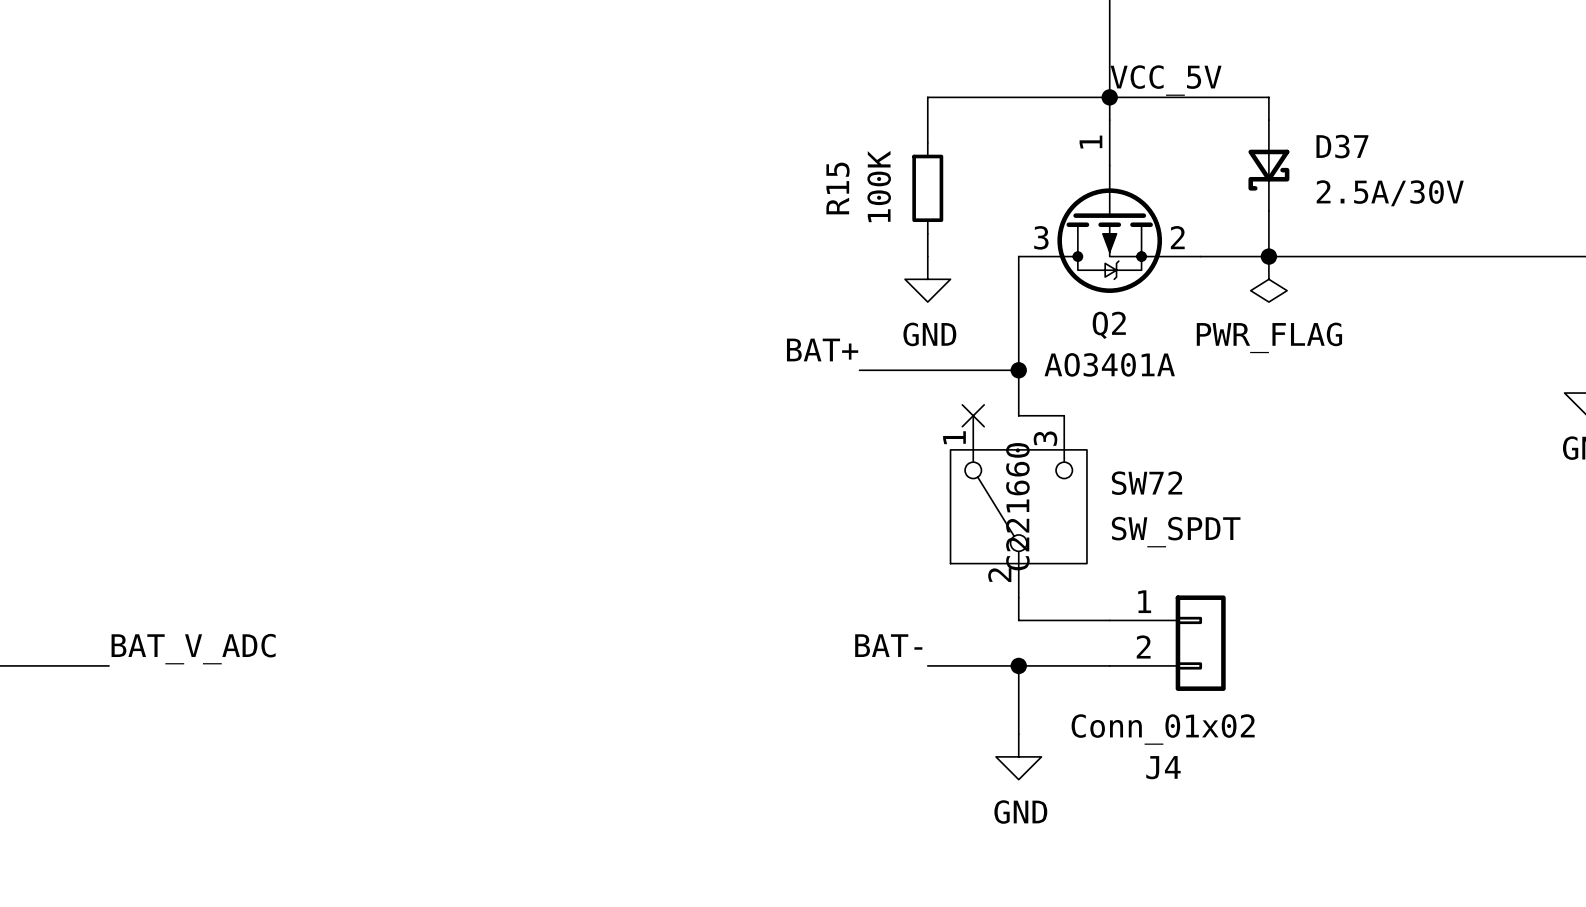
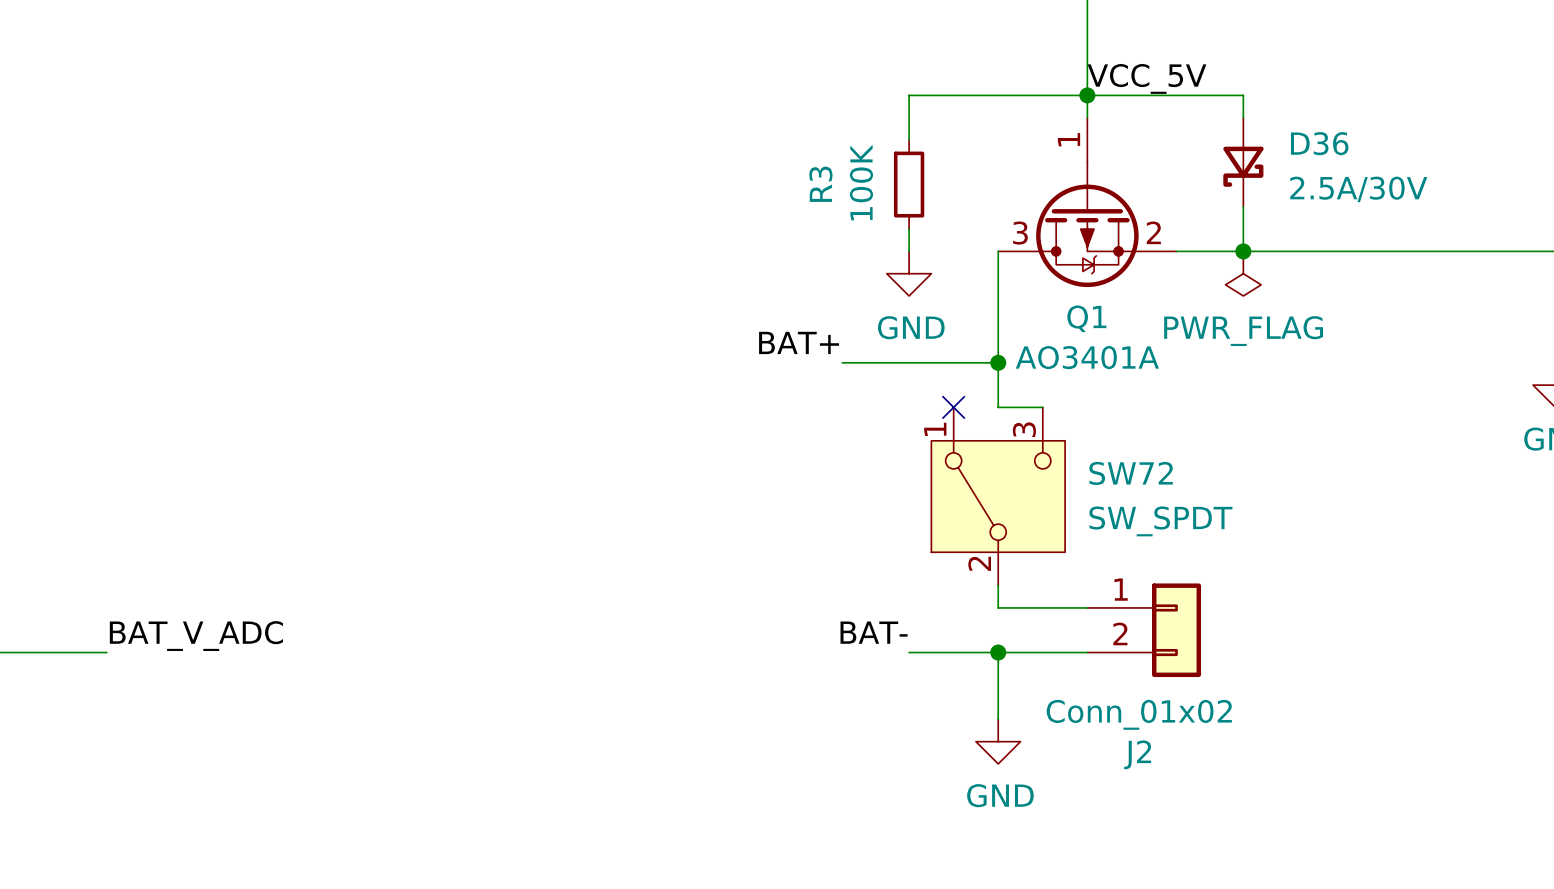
D37 name: D37 (1342, 146) -> D36 (1319, 143)
R15 name: R15 (838, 188) -> R3 (820, 184)
Q2 name: Q2 (1109, 325) -> Q1 (1086, 318)
SW72 text: C221660 (1017, 506) -> none
J4 name: J4 (1163, 767) -> J2 (1137, 754)

